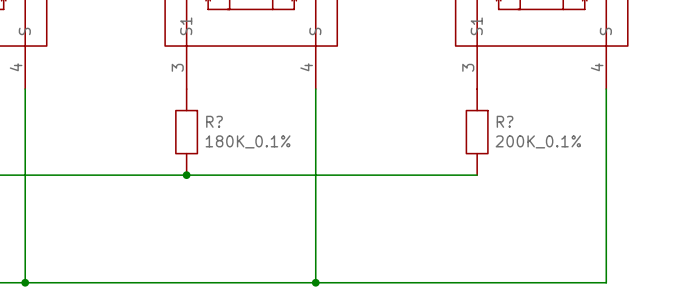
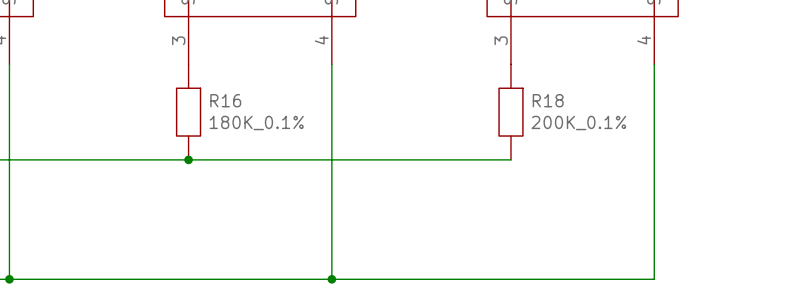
R? name: R? (214, 121) -> R16 (225, 100)
R? name: R? (505, 121) -> R18 (548, 100)

